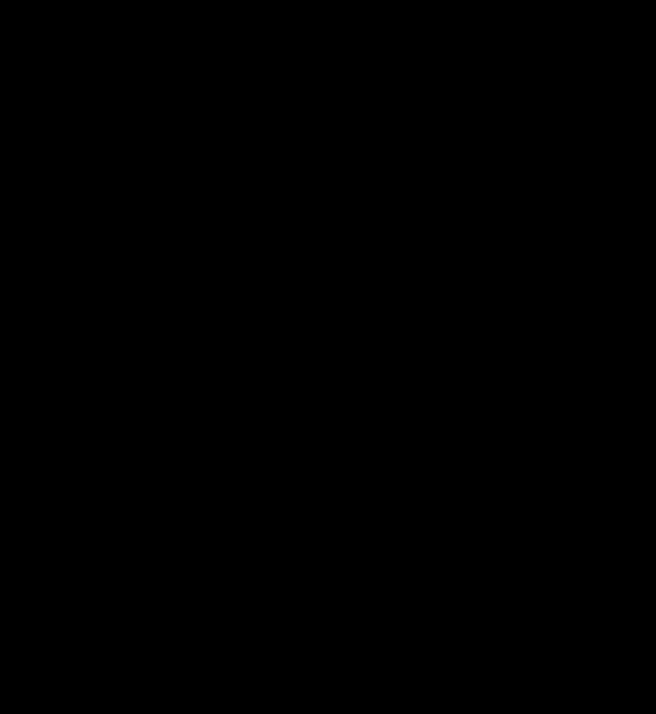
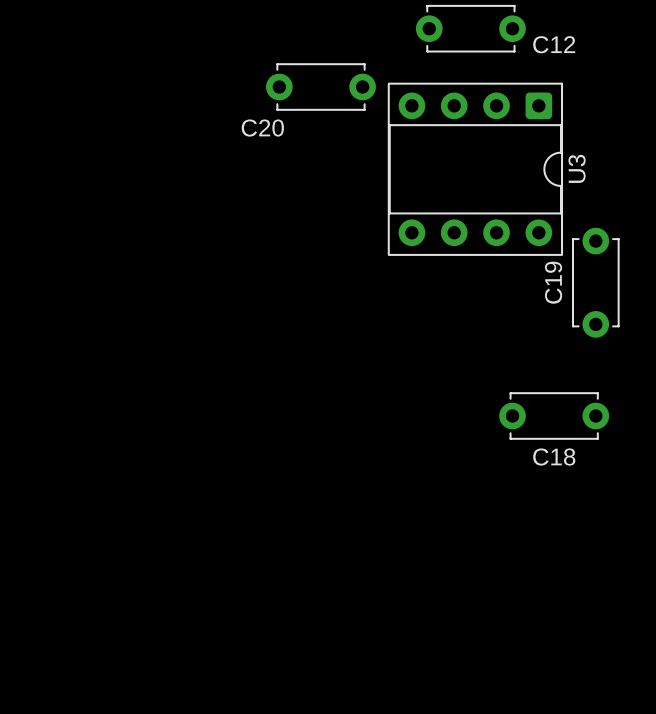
C12: none -> (470, 28)
C20: none -> (320, 87)
U3: none -> (475, 169)
C19: none -> (595, 282)
C18: none -> (554, 415)

